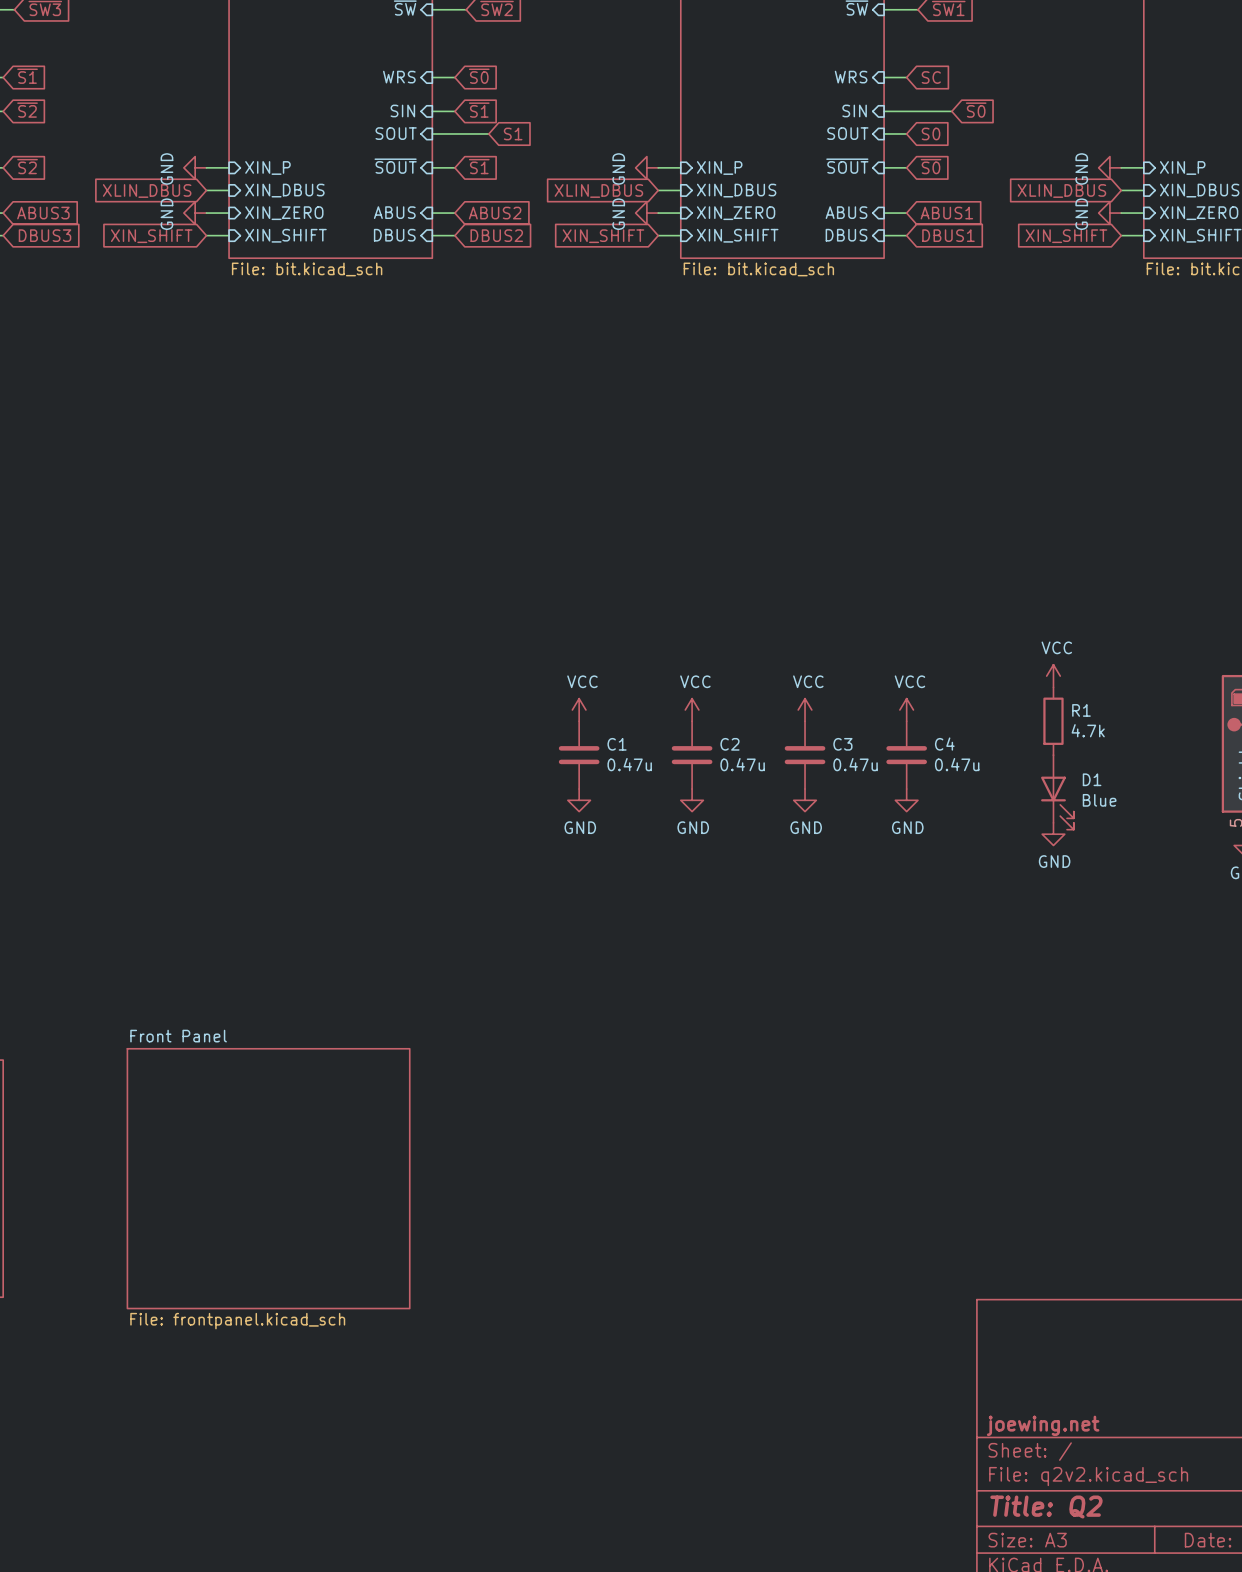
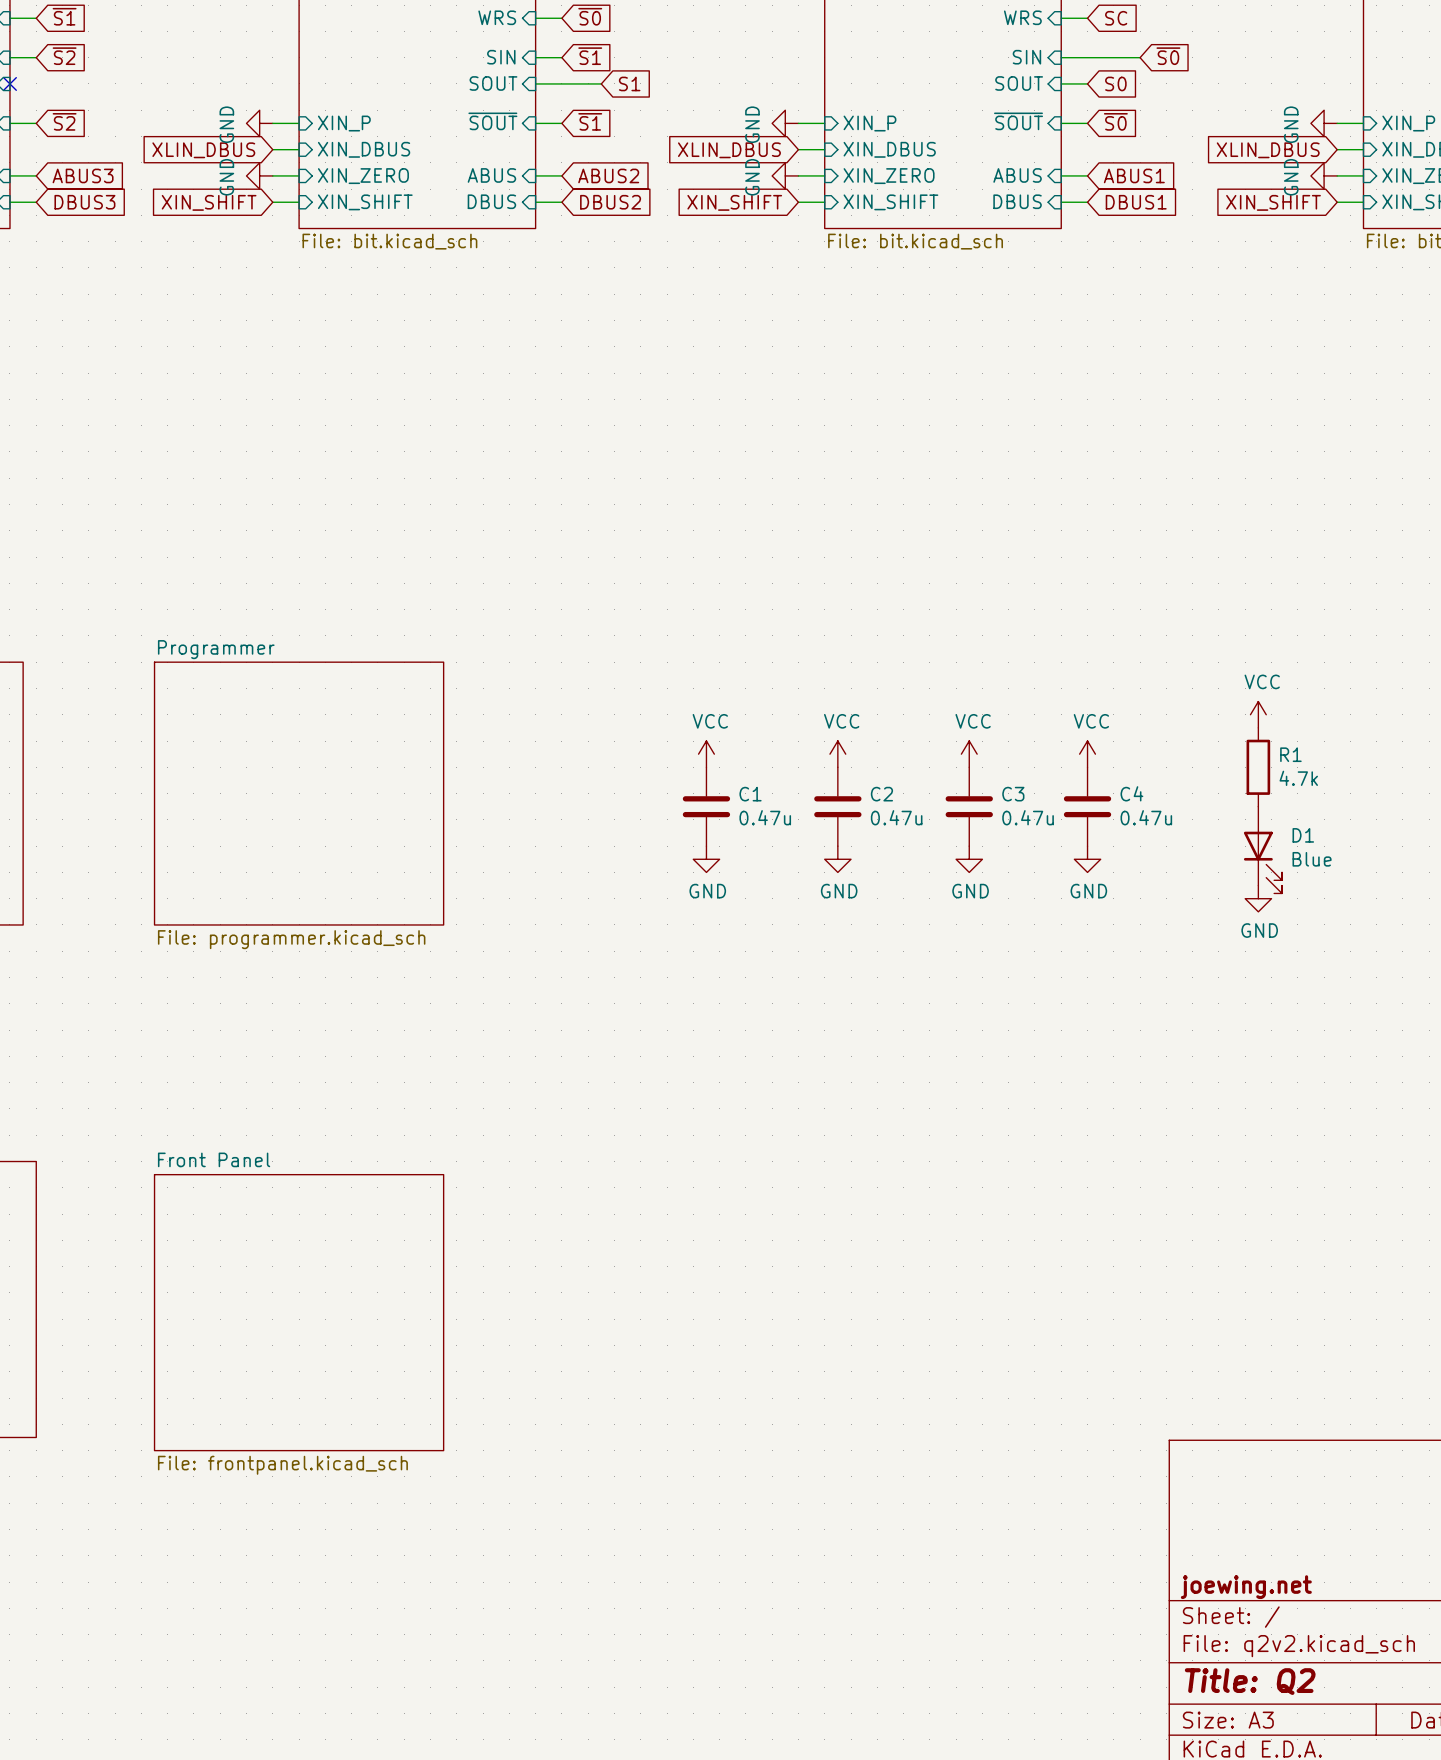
sheet Programmer: none -> File: programmer.kicad_sch (299, 793)
sheet Front Panel: File: frontpanel.kicad_sch (268, 1178) -> none
sheet Front Panel: none -> File: frontpanel.kicad_sch (299, 1312)

